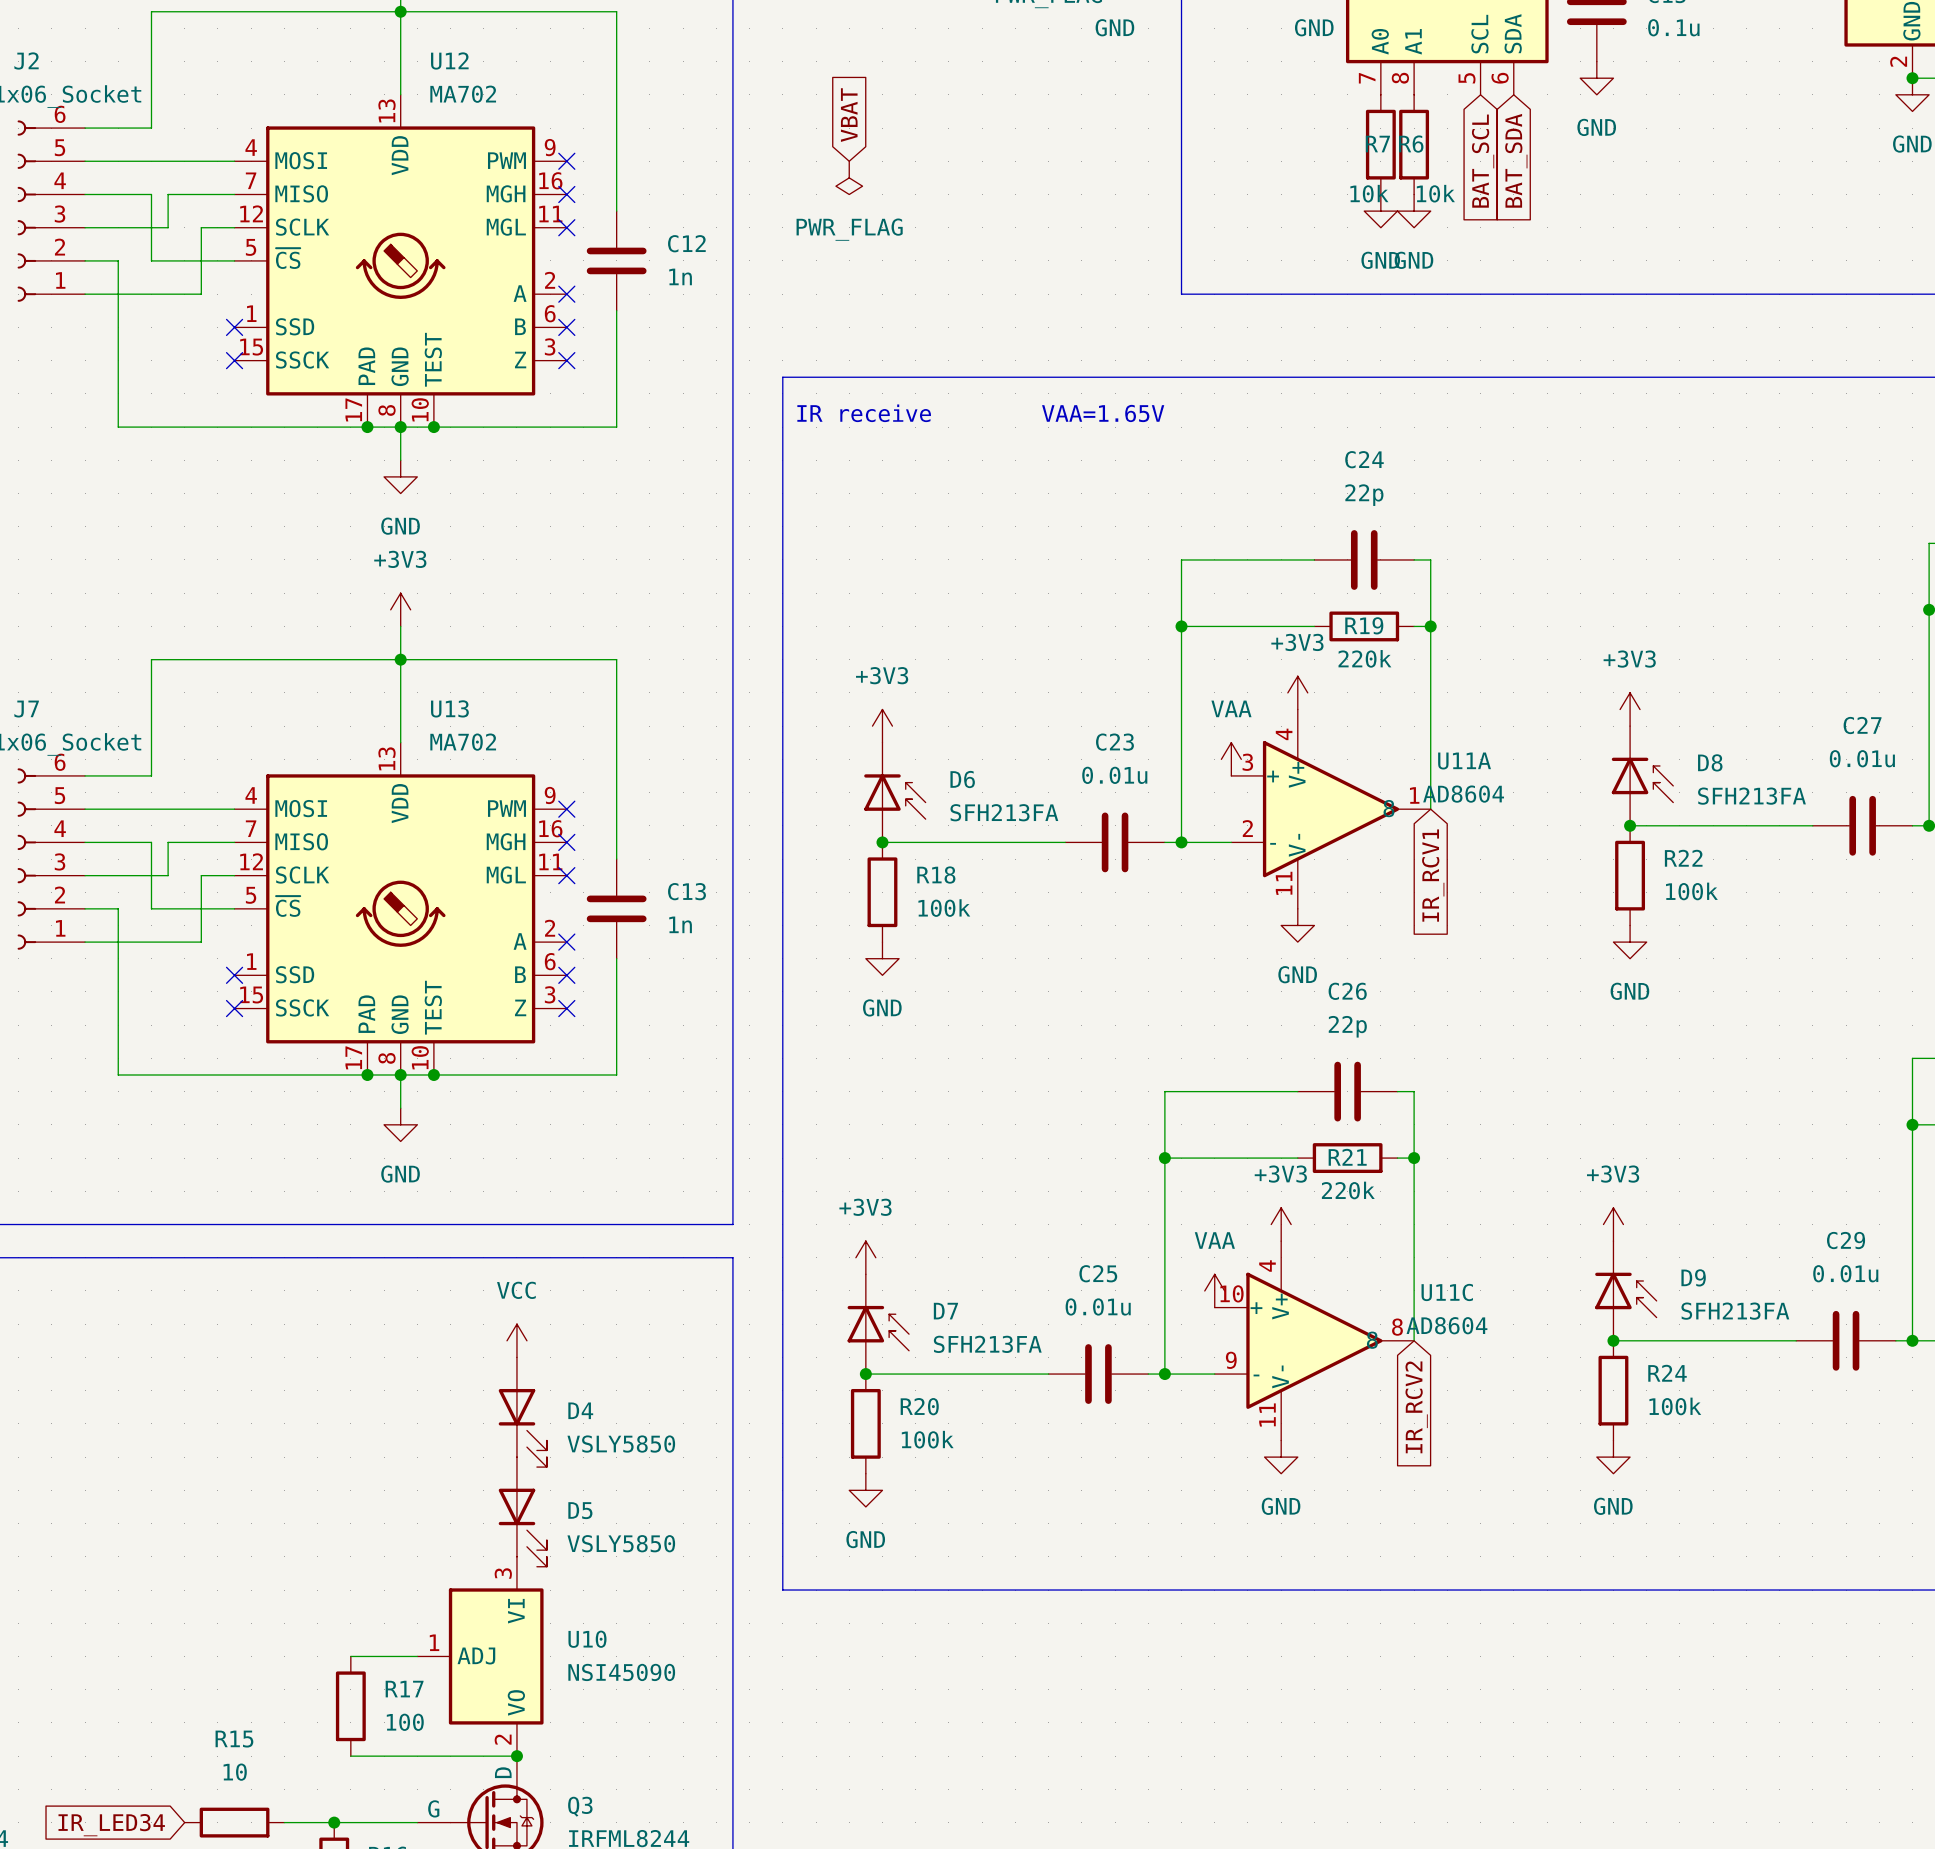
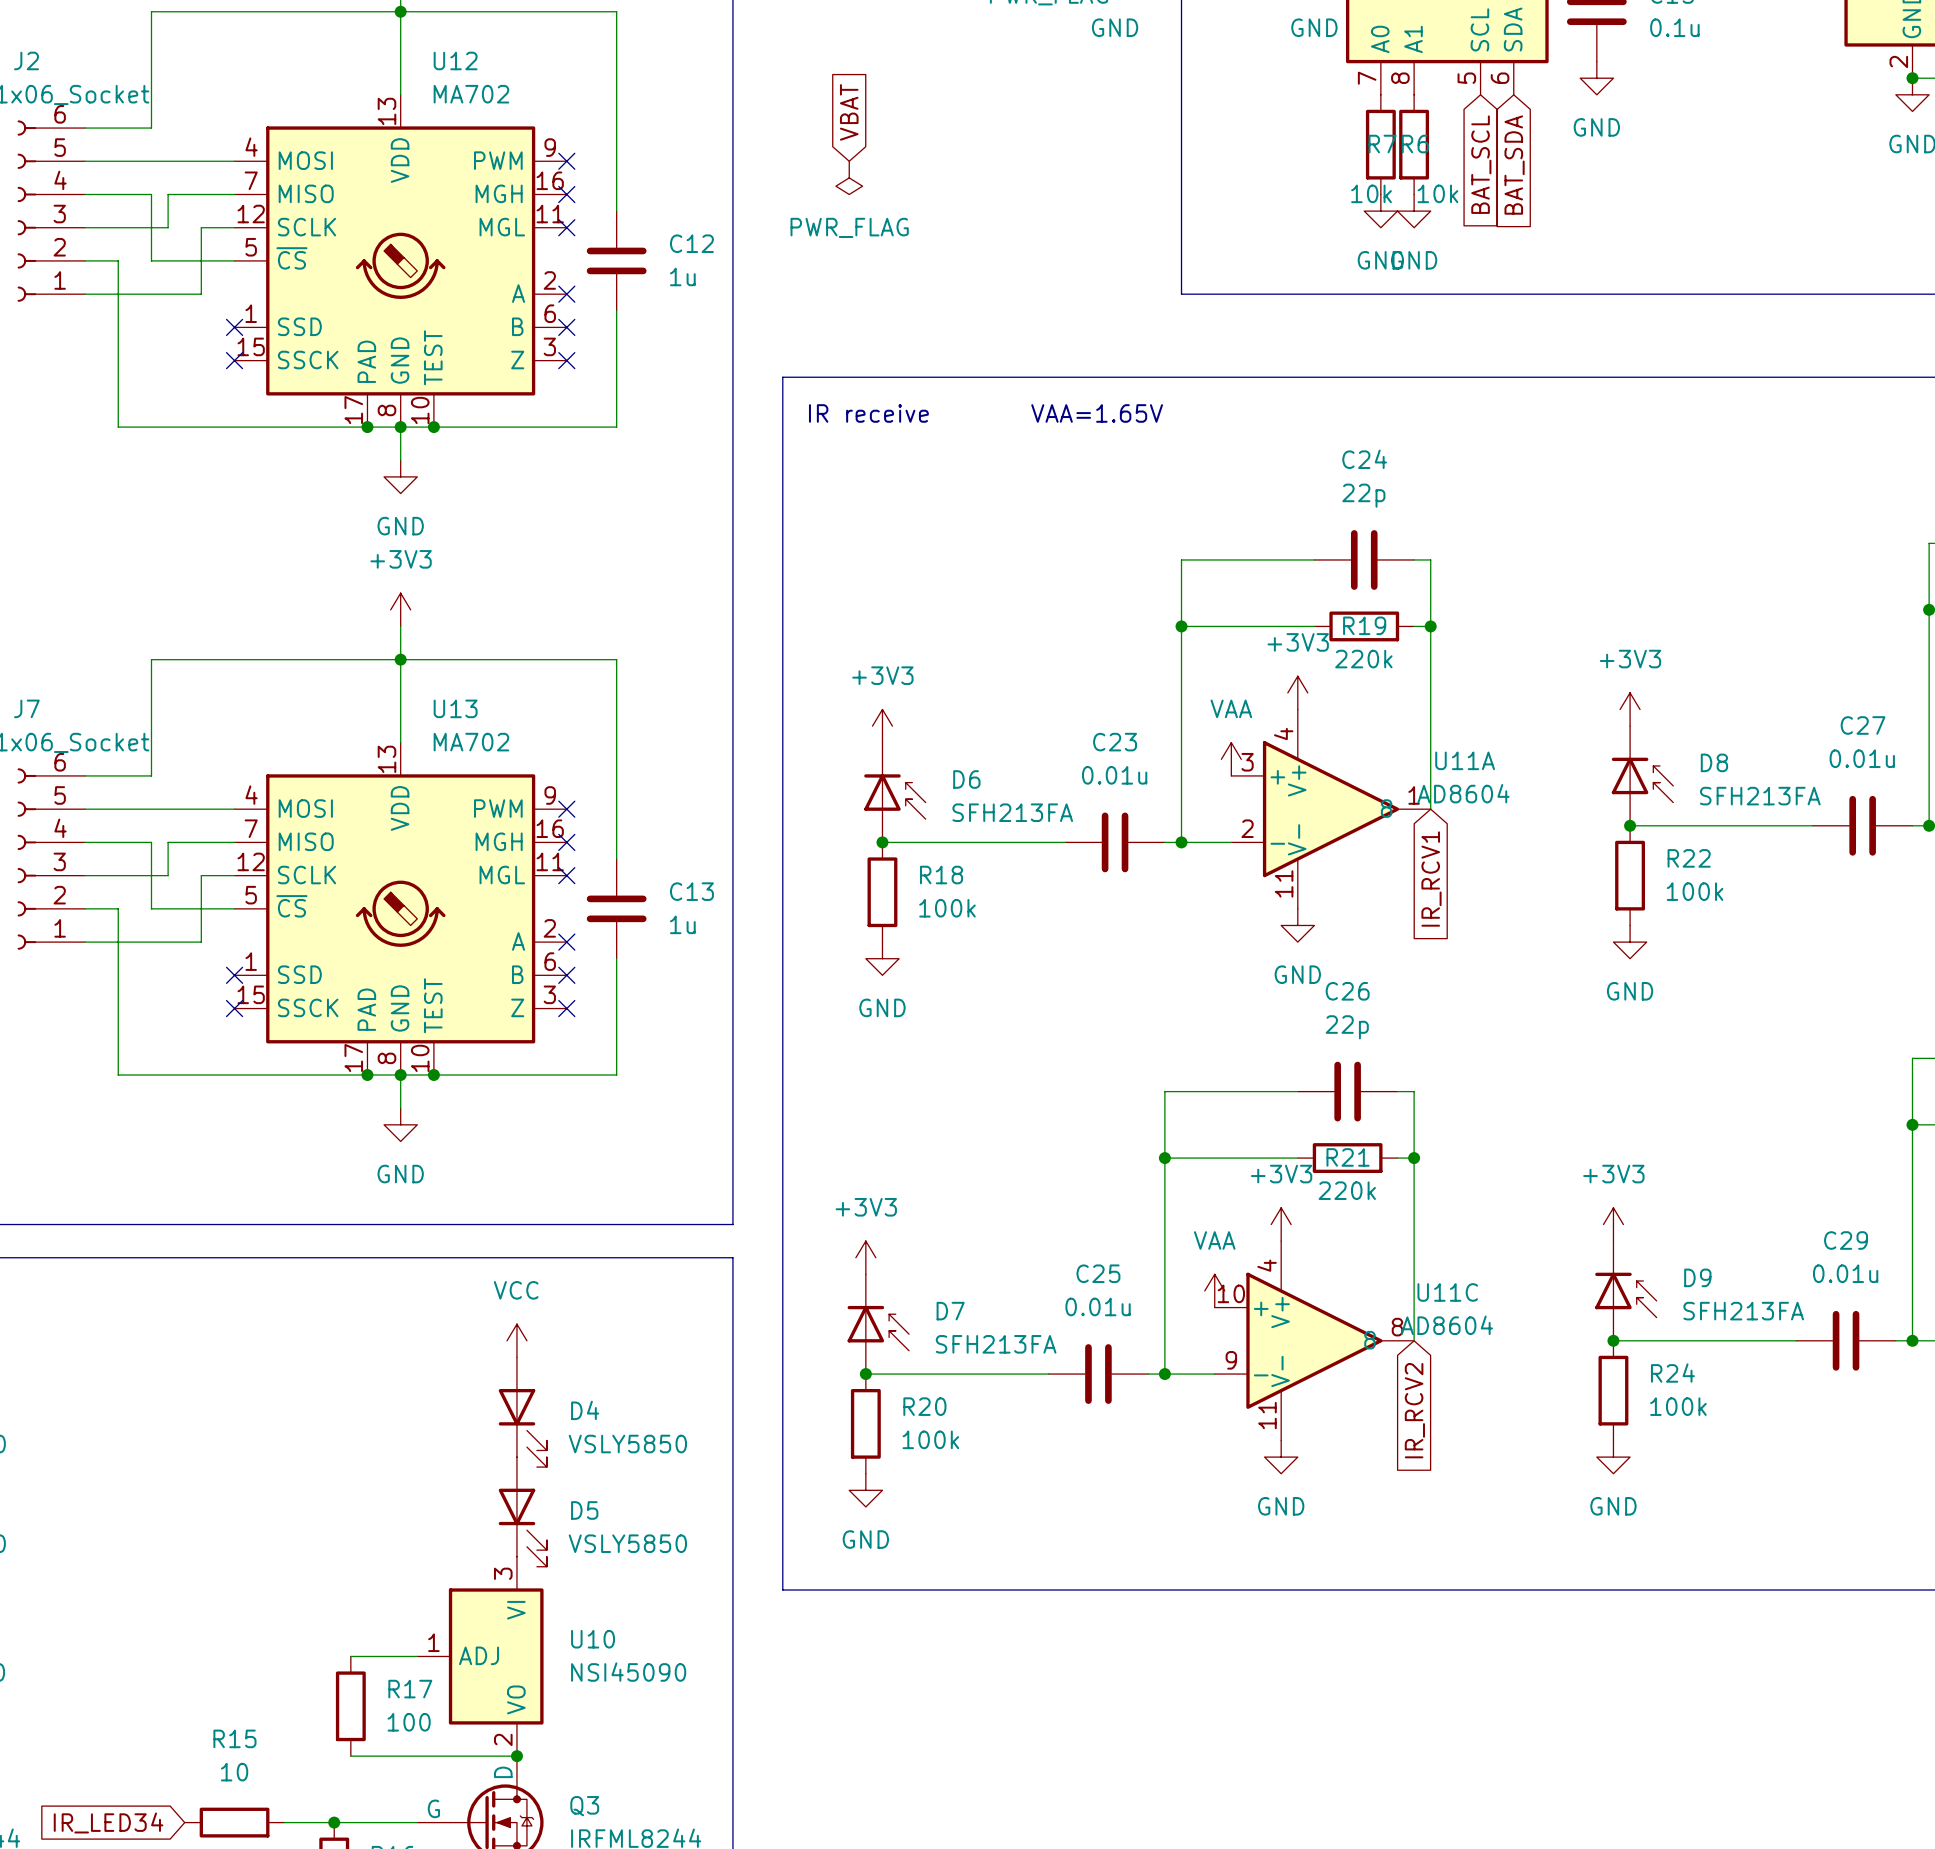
C12 value: 1n (680, 276) -> 1u (682, 276)
C13 value: 1n (680, 924) -> 1u (682, 924)

